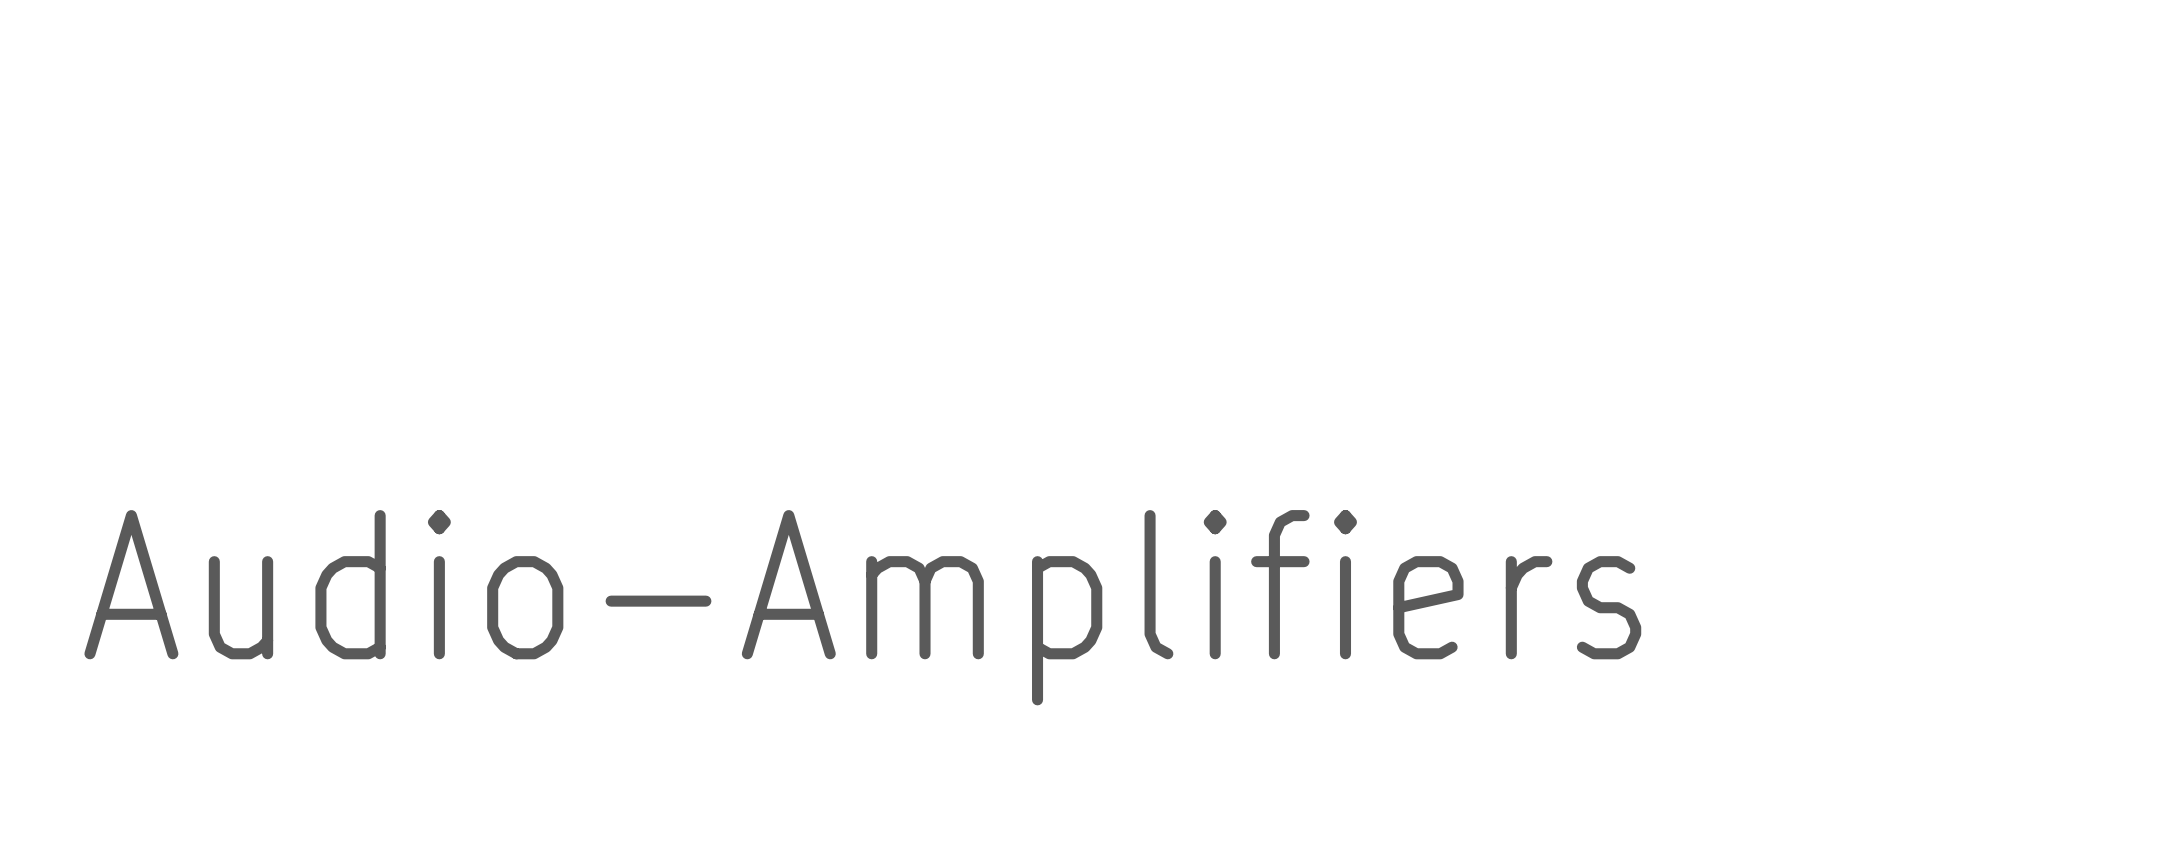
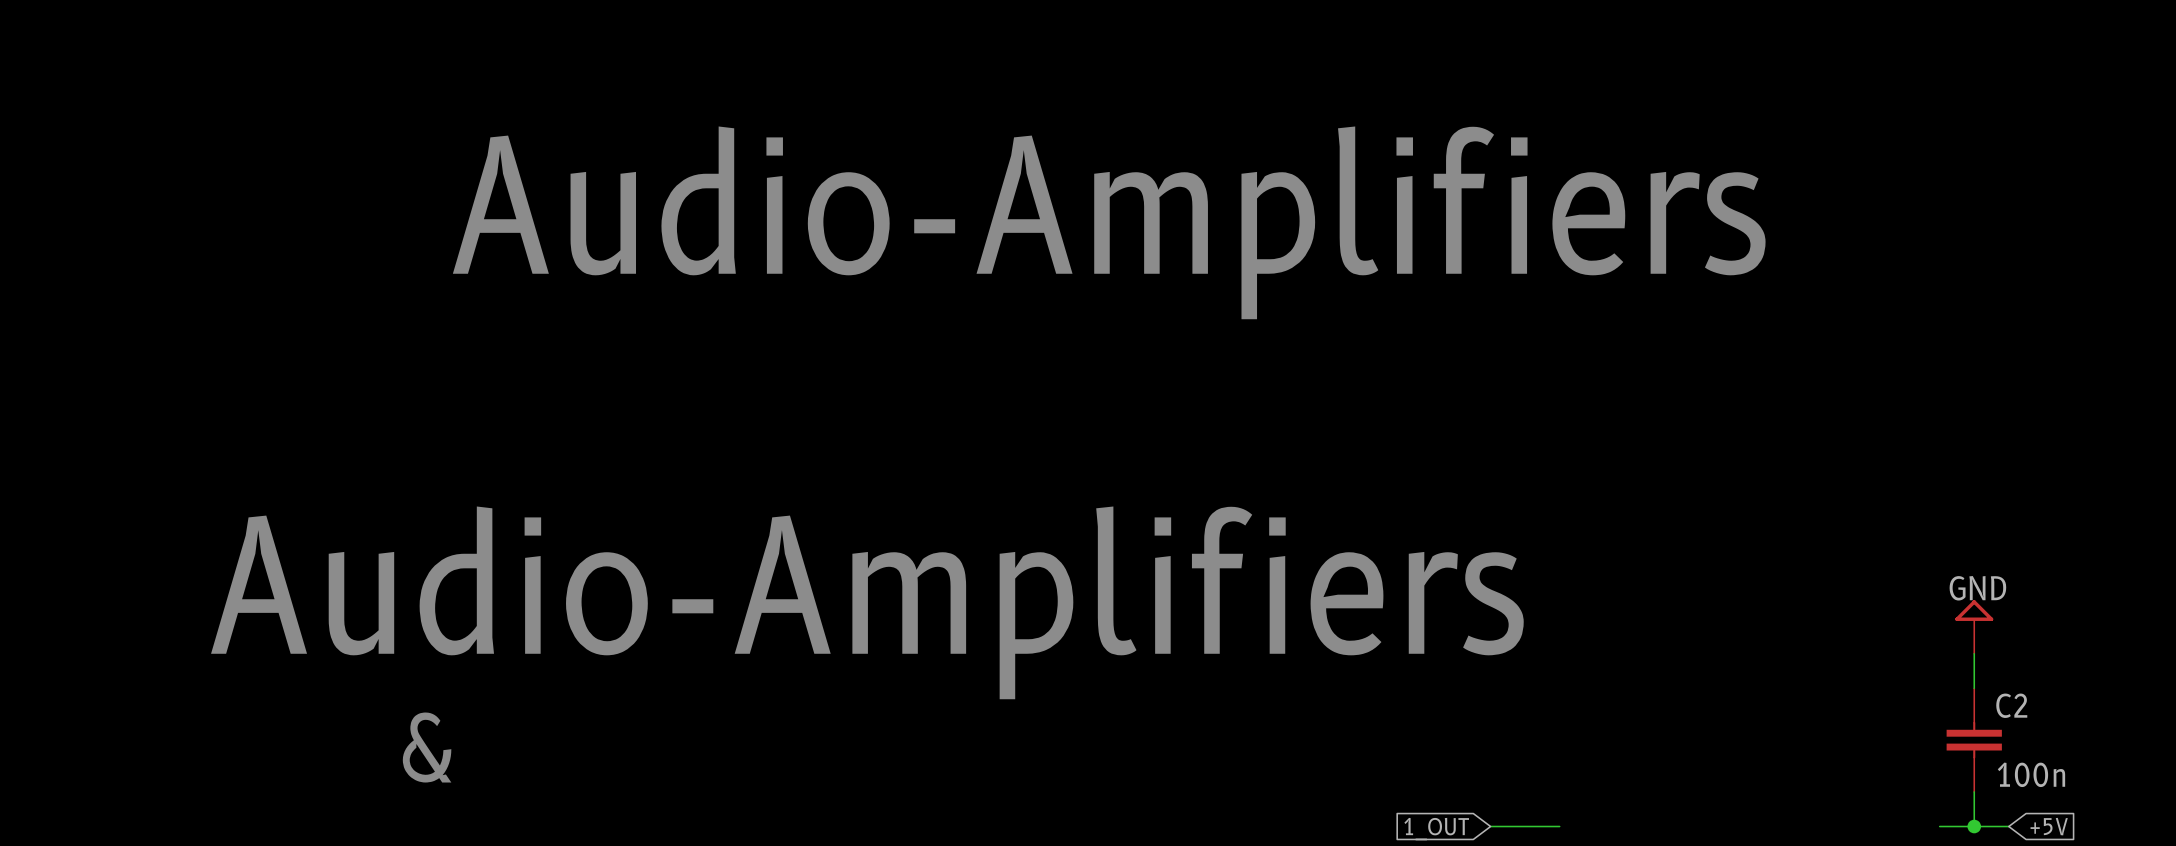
text: none -> Audio-Amplifiers (1109, 222)
power symbol: none -> GND (1974, 627)
wire: none -> (1974, 653) (1974, 688)
C2: none -> 100n (1974, 740)
text: none -> & (427, 747)
wire: none -> (1974, 791) (1974, 826)
wire: none -> (1490, 826) (1559, 826)
wire: none -> (1939, 826) (2008, 826)
junction: none -> (1974, 826)
global label: none -> +5V (2049, 826)
global label: none -> 1_OUT (1436, 829)

